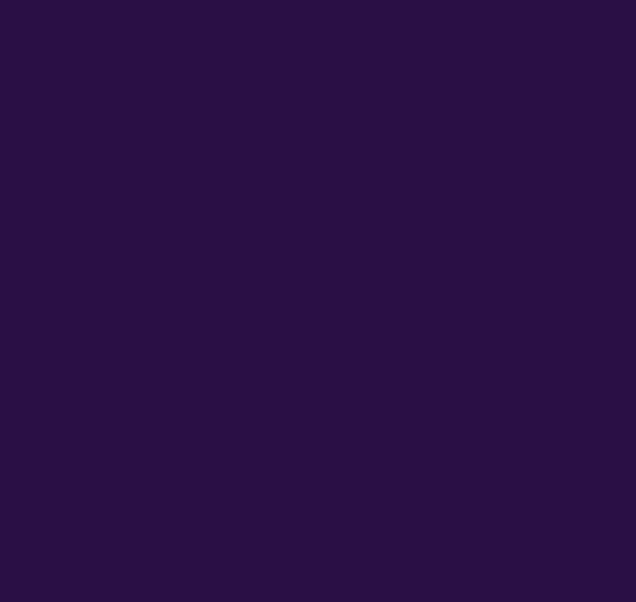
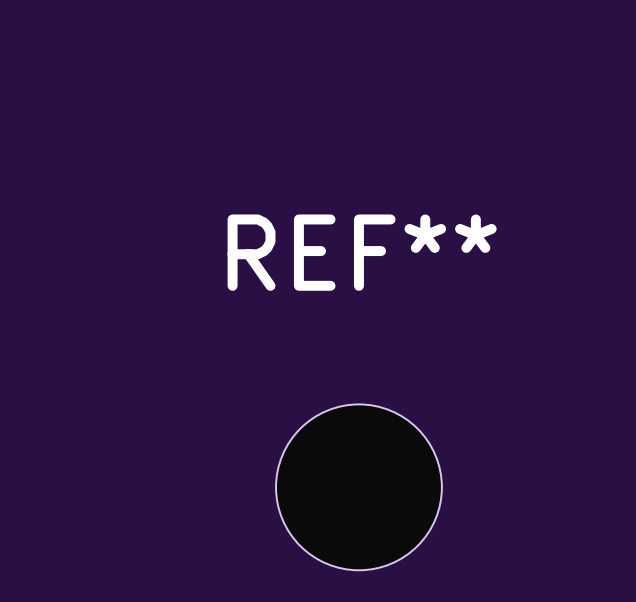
REF**: none -> (358, 487)

